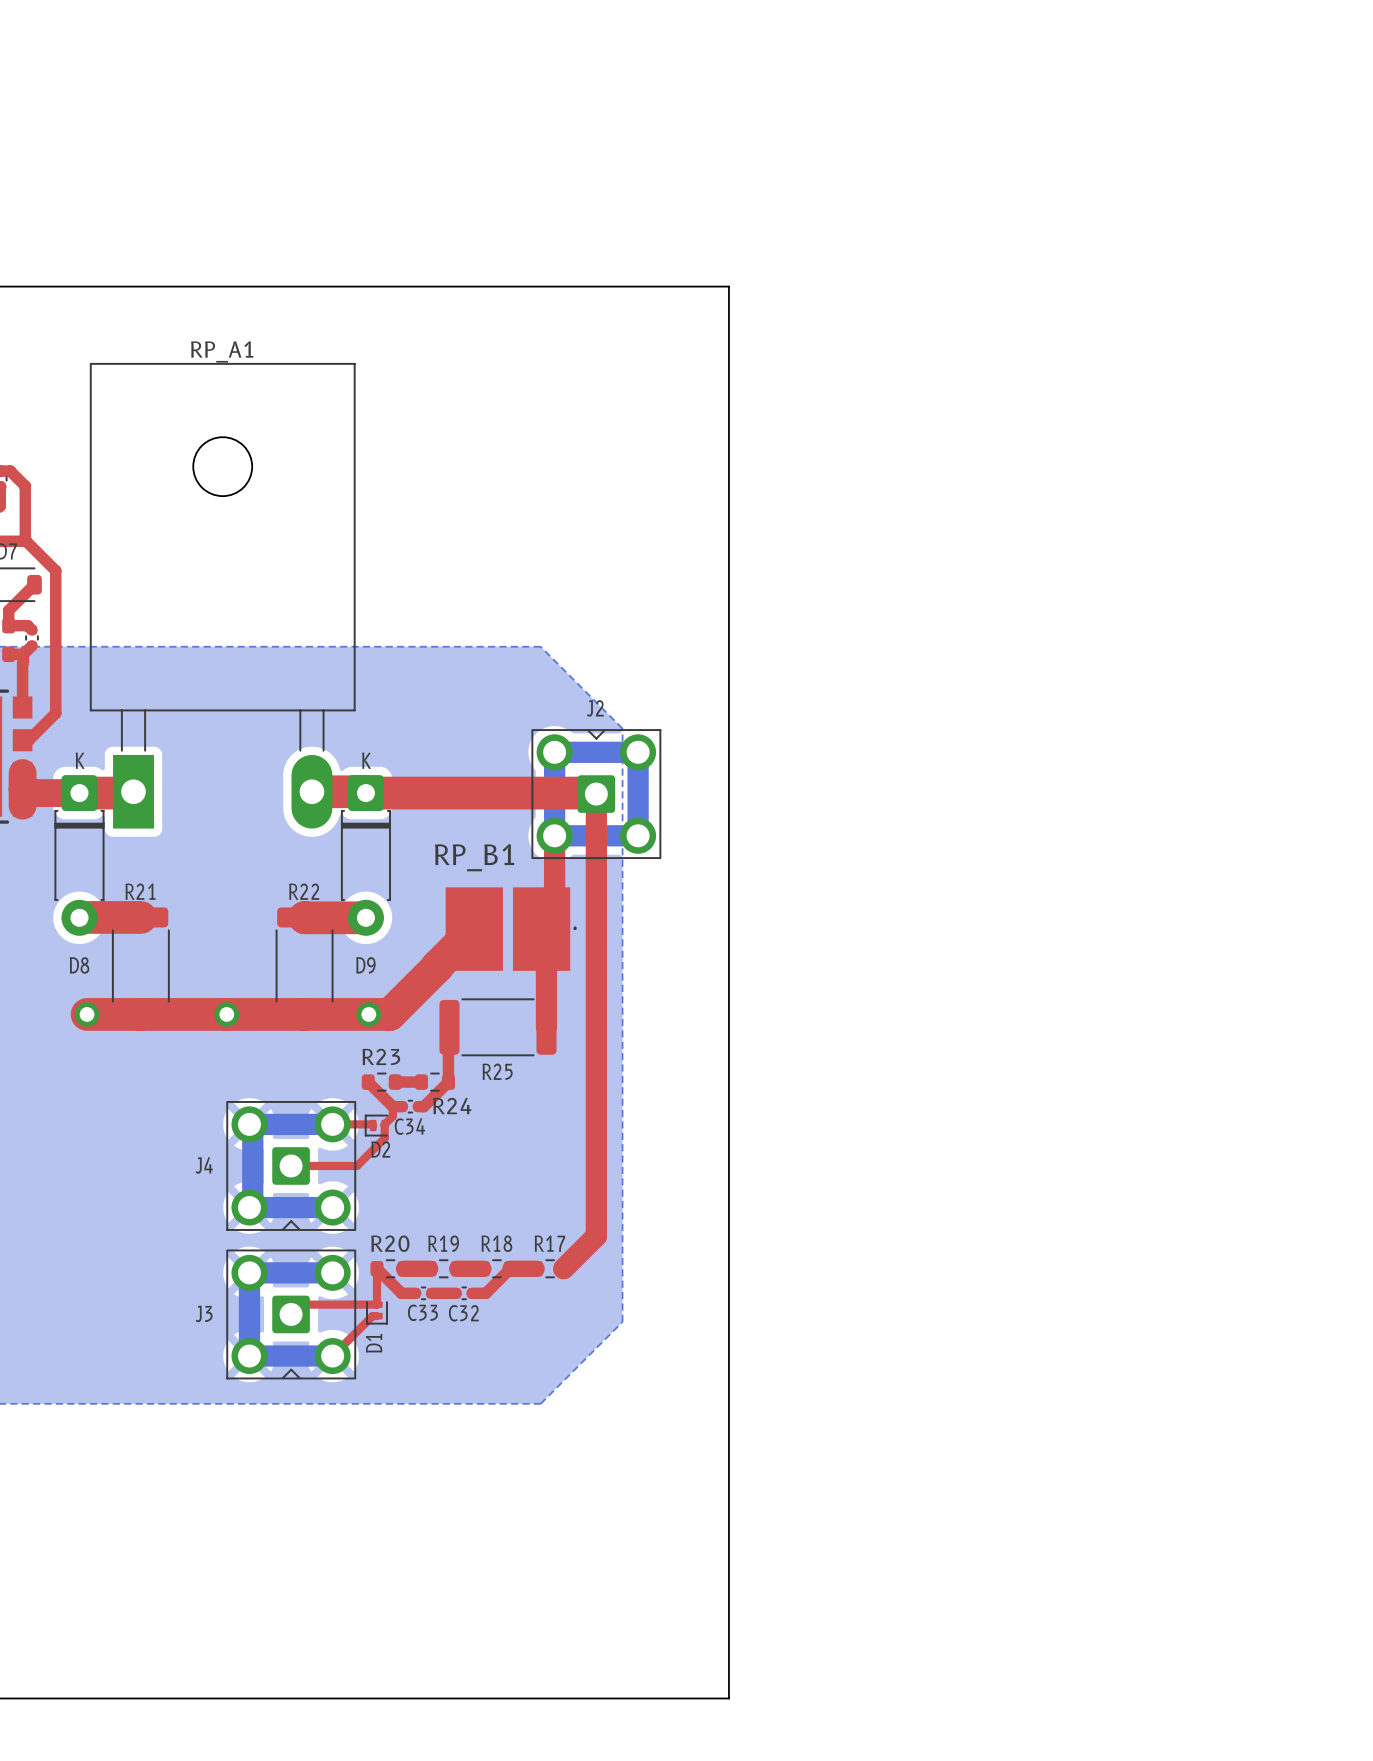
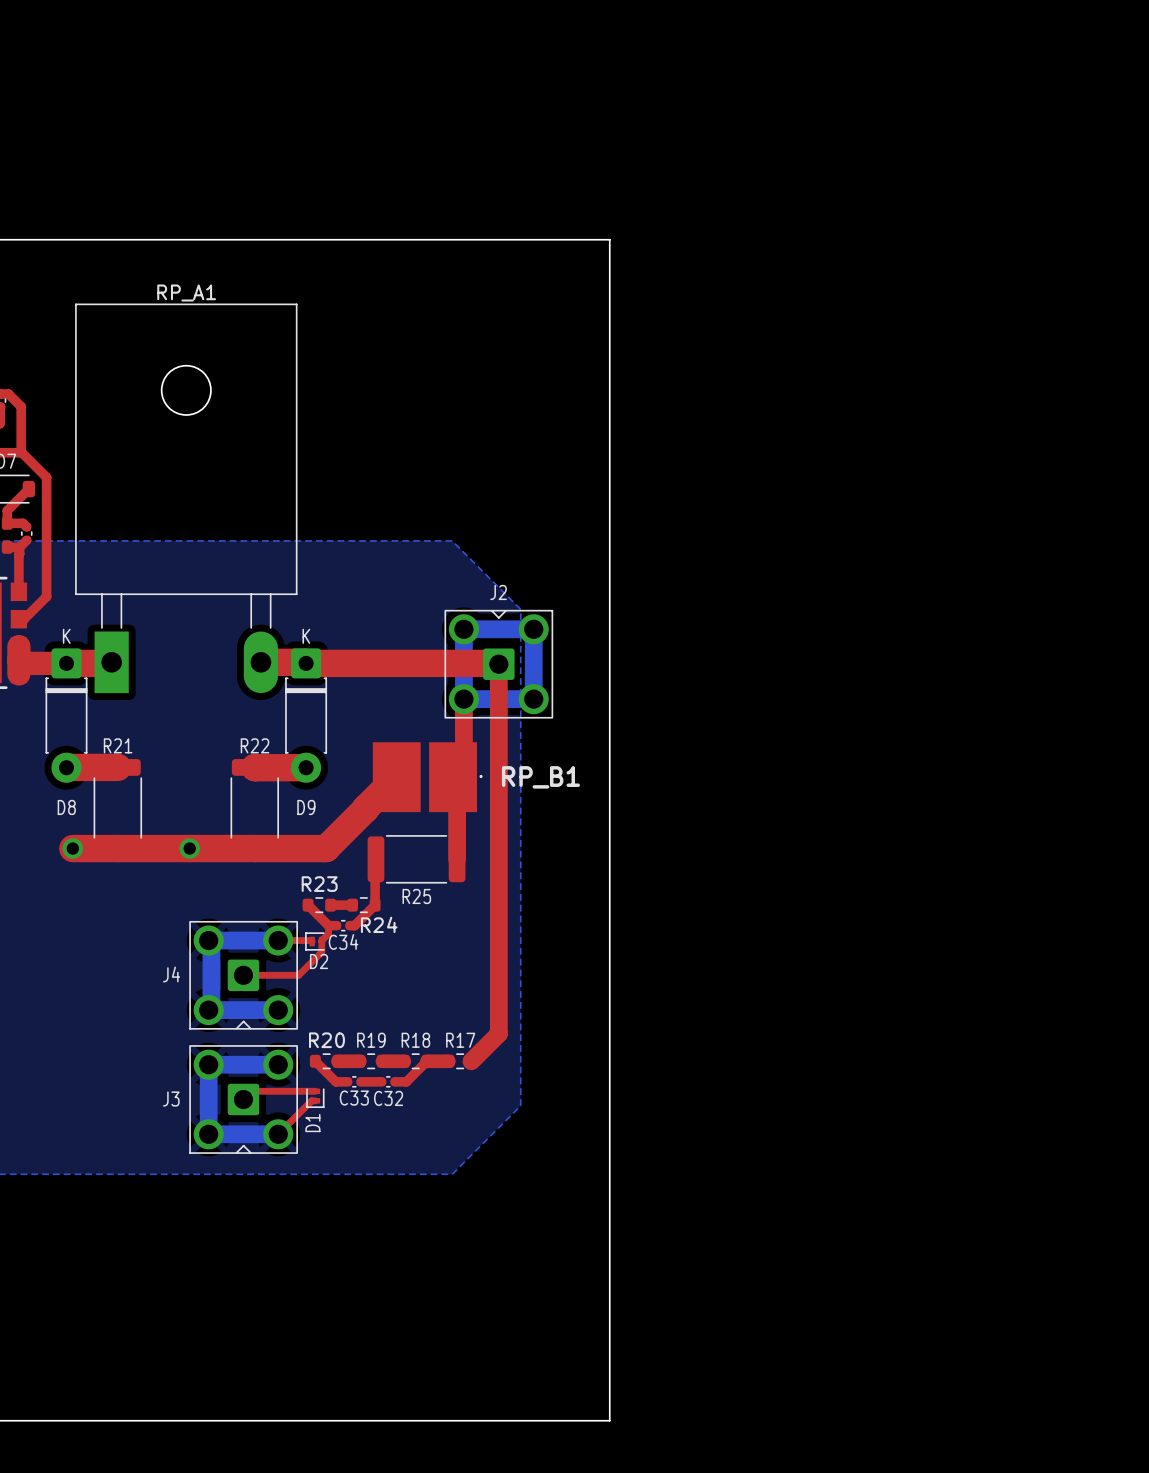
RP_B1 name position: RP_B1 (474, 857) -> RP_B1 (540, 777)
via: (368, 1014) -> none
top track: (377, 1268) (377, 1304) -> none

